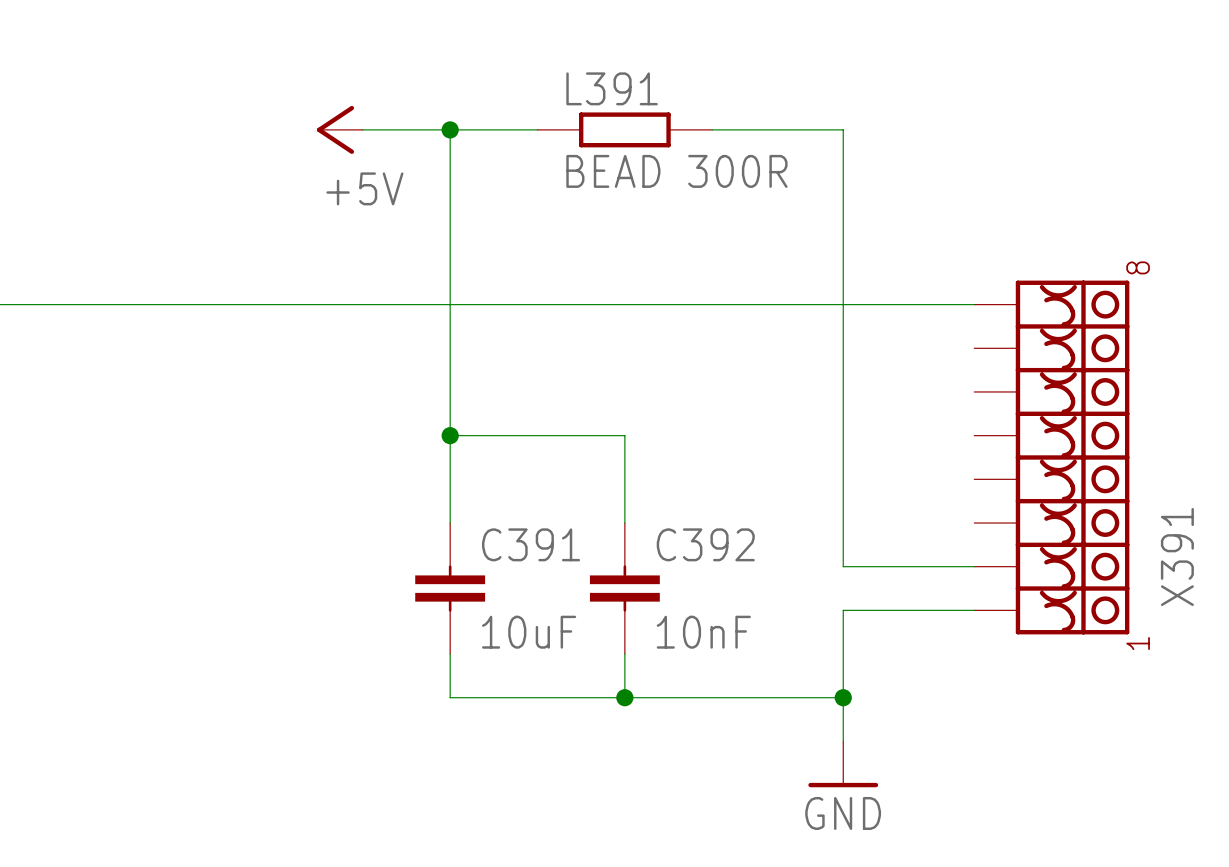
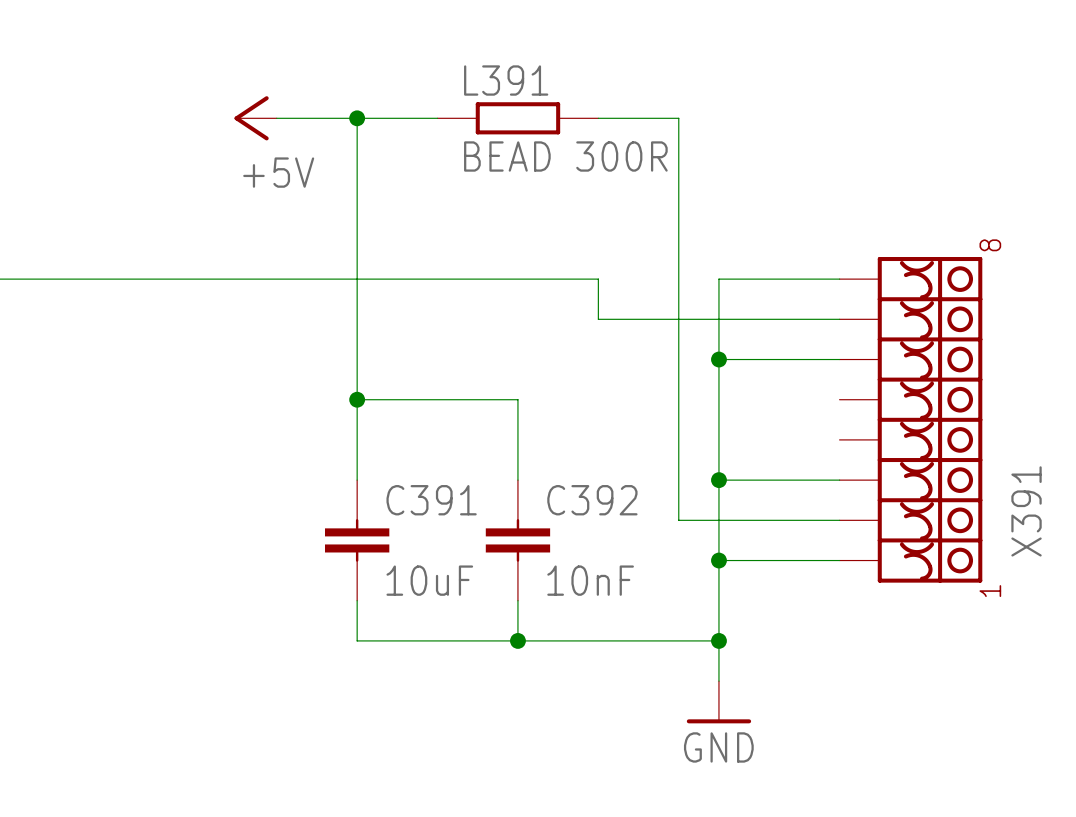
wire: (799, 129) (843, 129) (843, 304) (712, 304) -> (839, 319) (598, 319) (598, 279)
wire: none -> (678, 118) (678, 520) (718, 520) (718, 560)
wire: none -> (718, 359) (839, 359)
junction: none -> (718, 359)
wire: none -> (718, 480) (839, 480)
junction: none -> (718, 480)
junction: none -> (718, 560)

